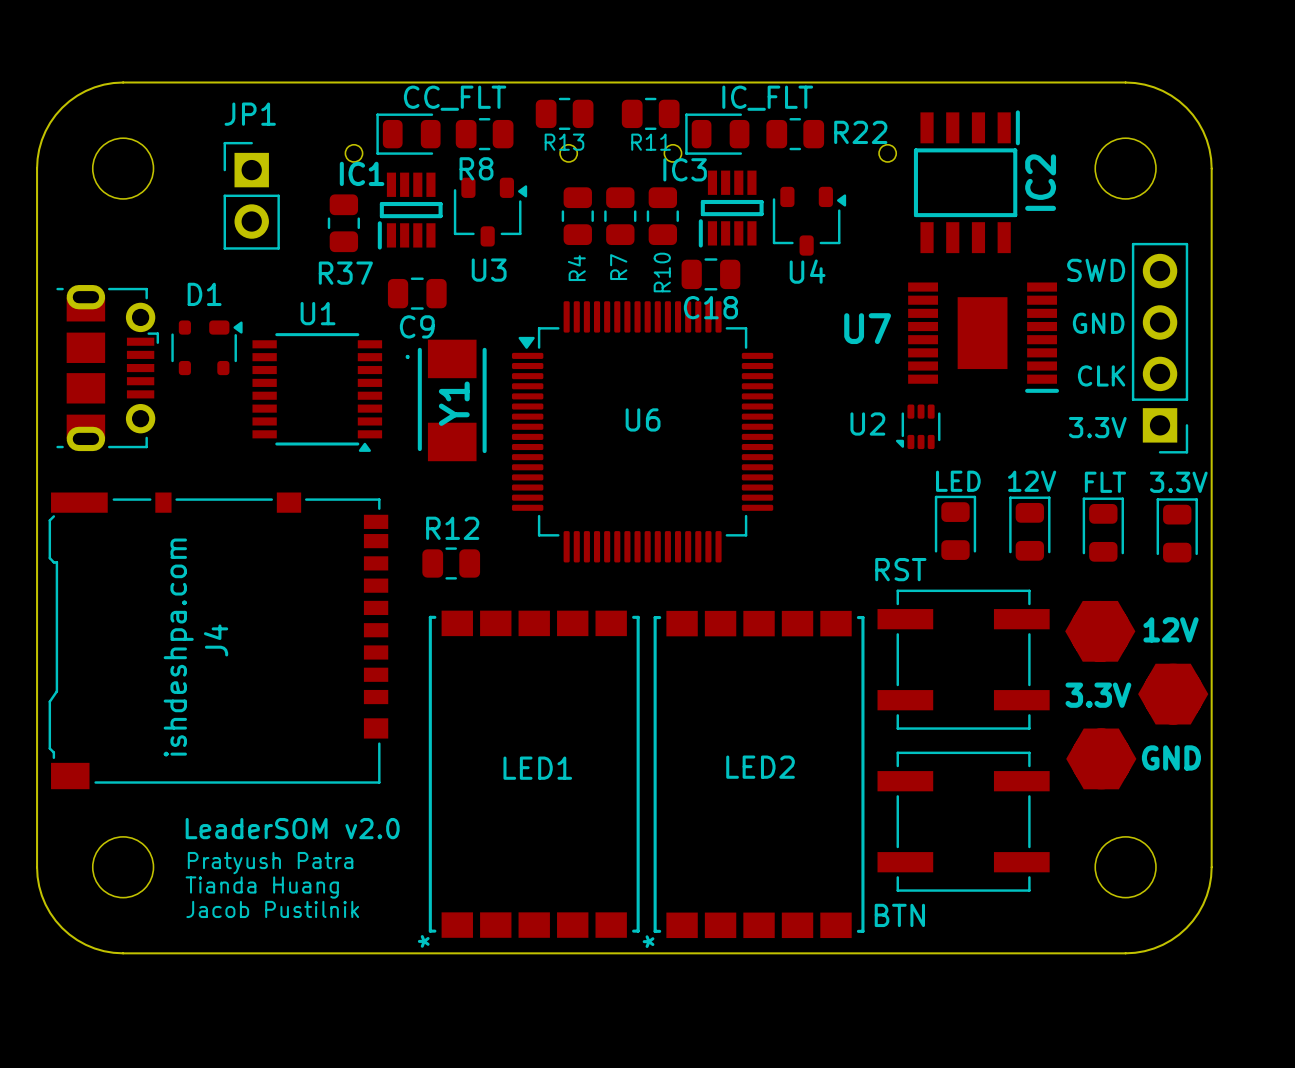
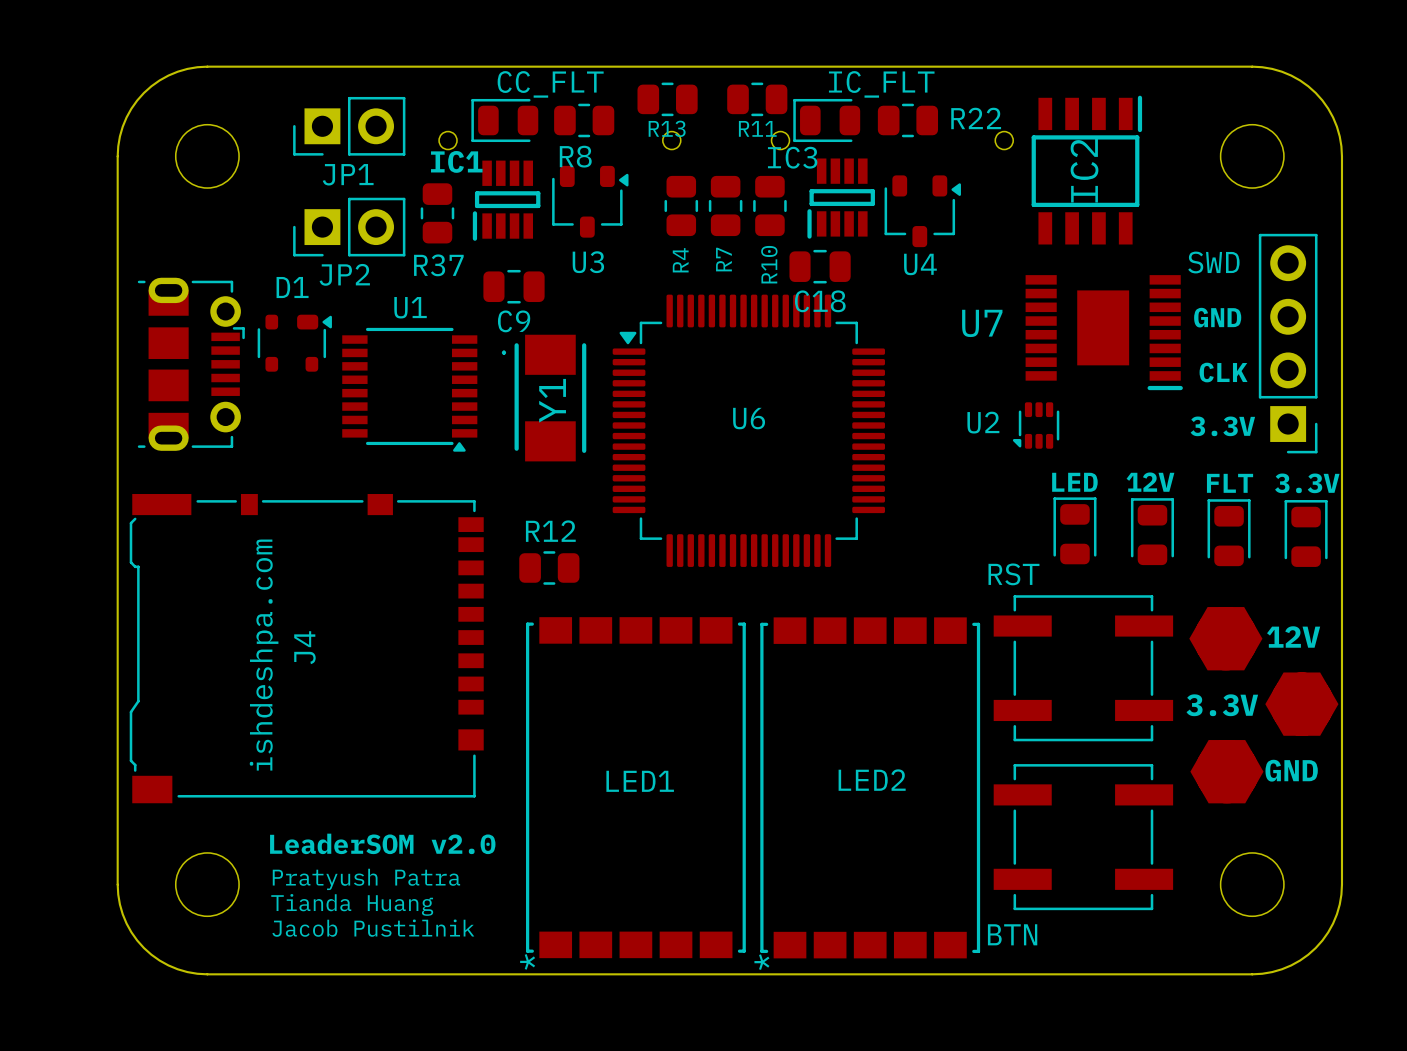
JP1 name position: JP1 (250, 114) -> JP1 (348, 174)
IC2 name position: IC2 (1040, 182) -> IC2 (1084, 170)
JP1 rotation: 0° (251, 195) -> 90° counterclockwise (349, 126)
JP2: none -> (349, 227)

